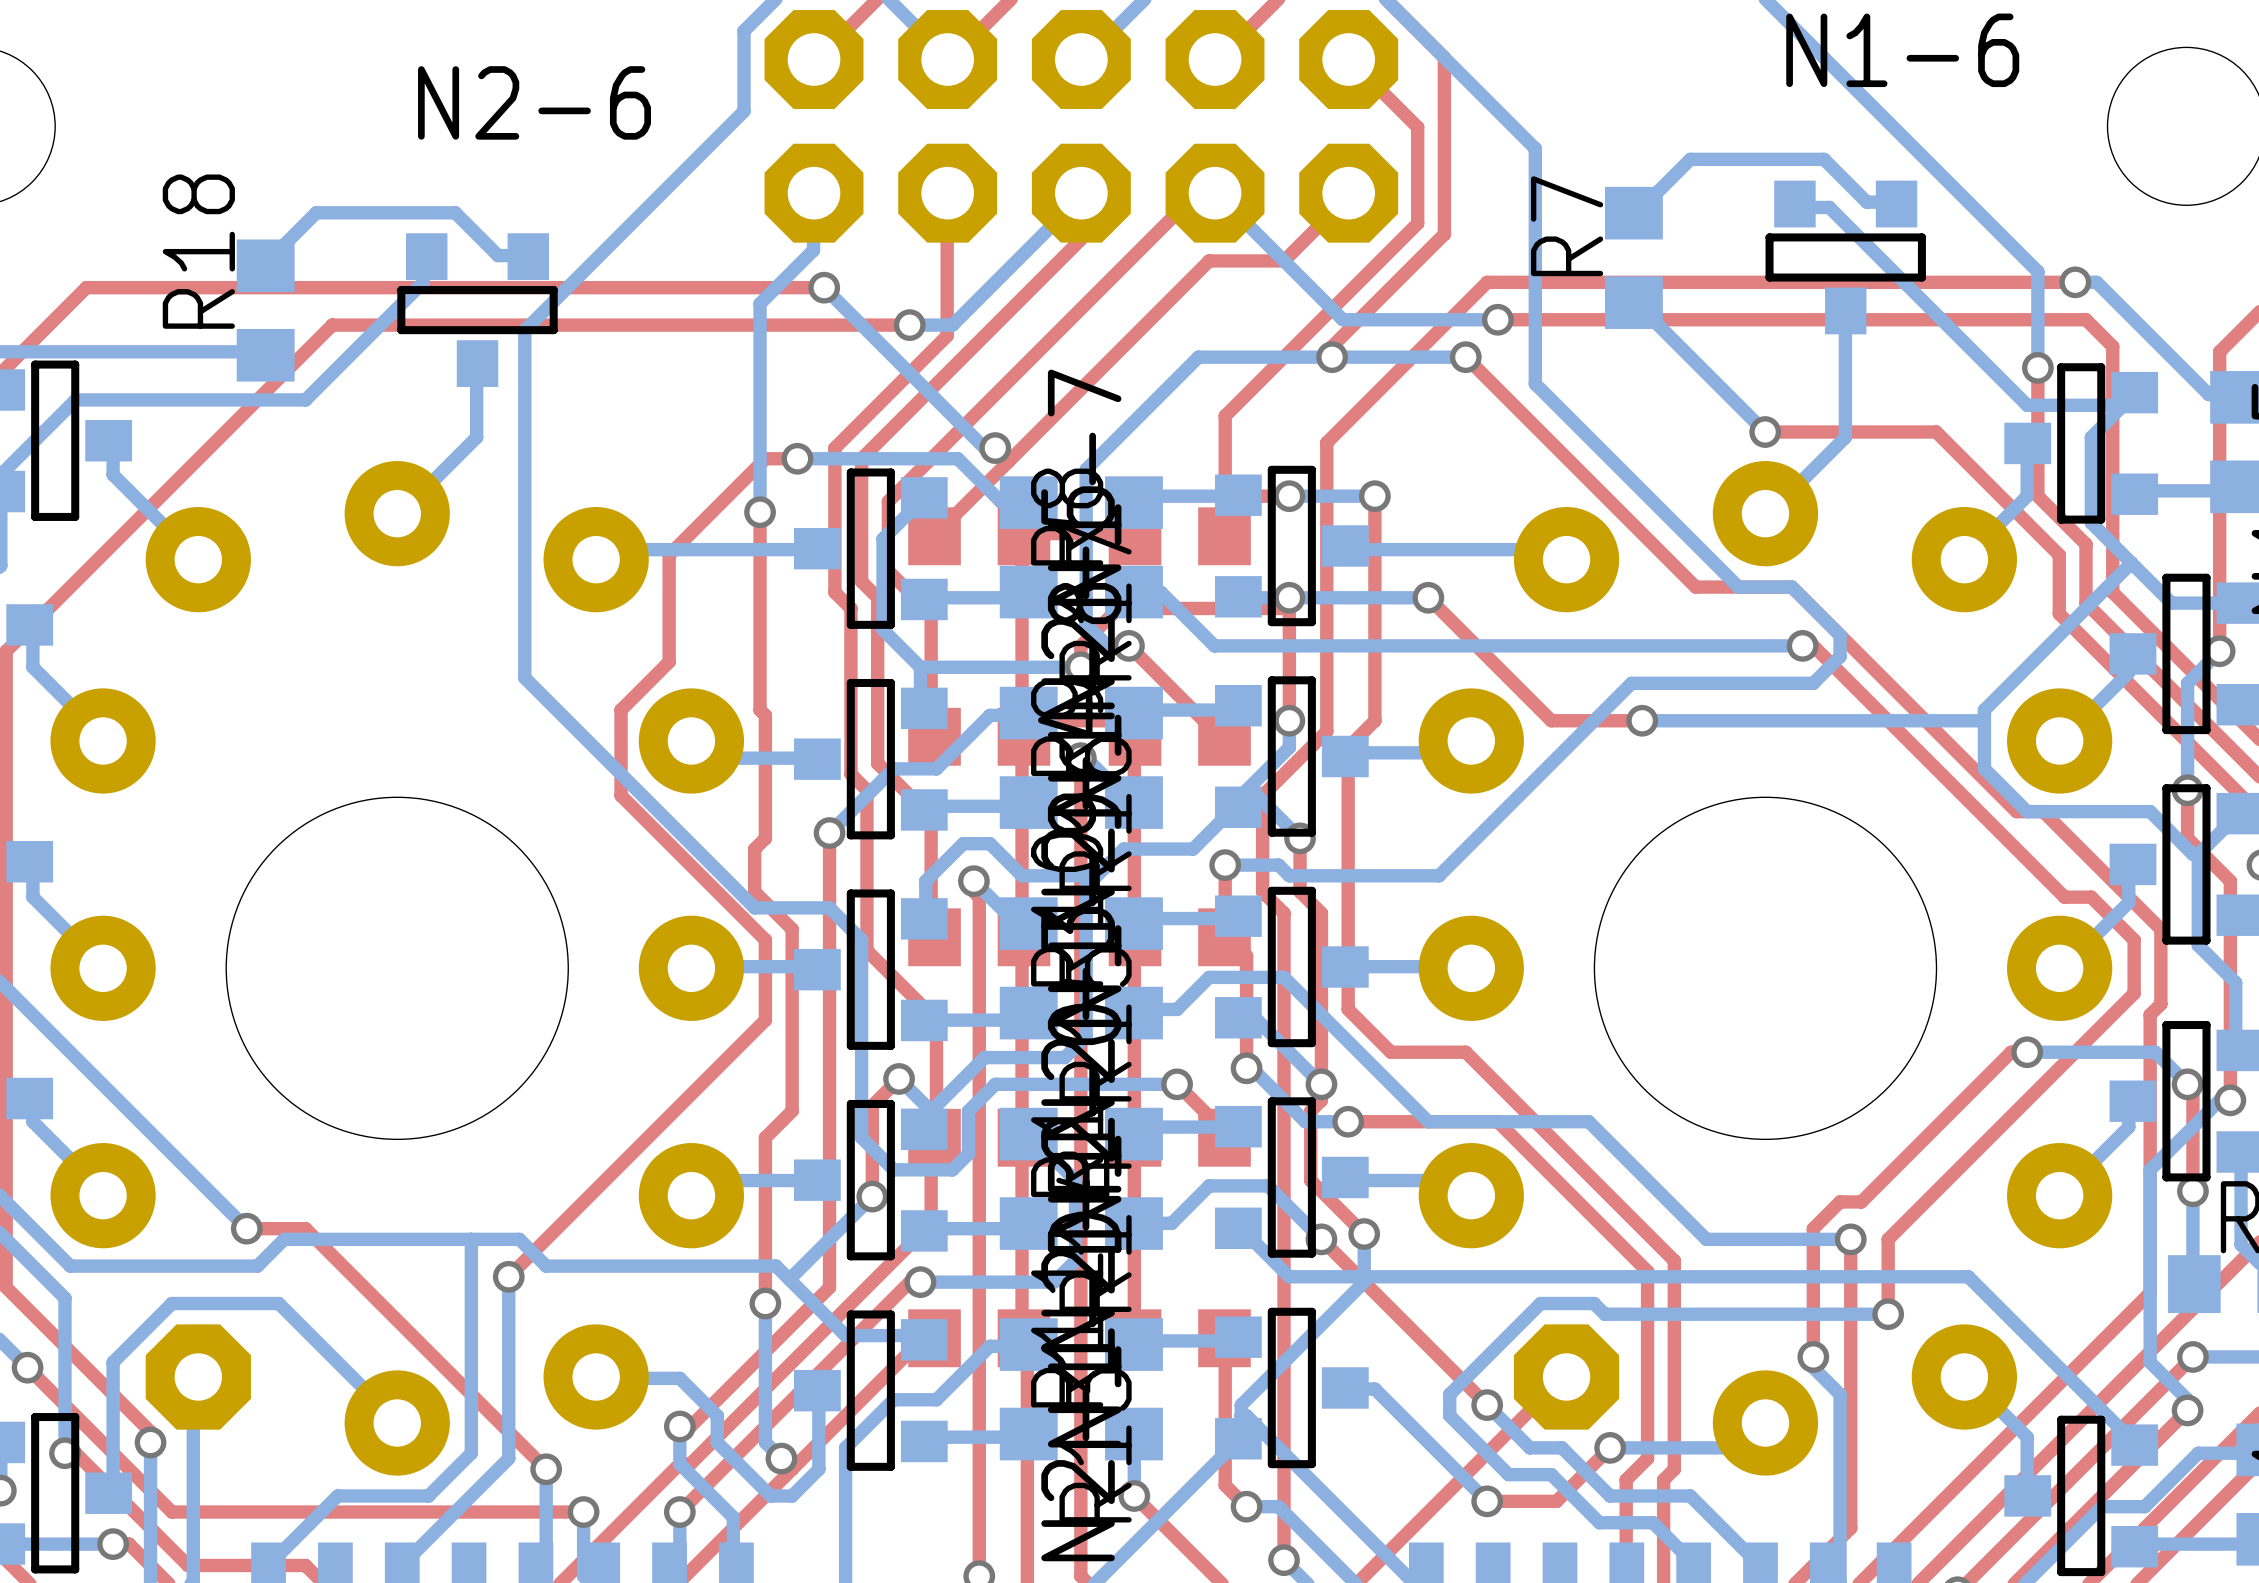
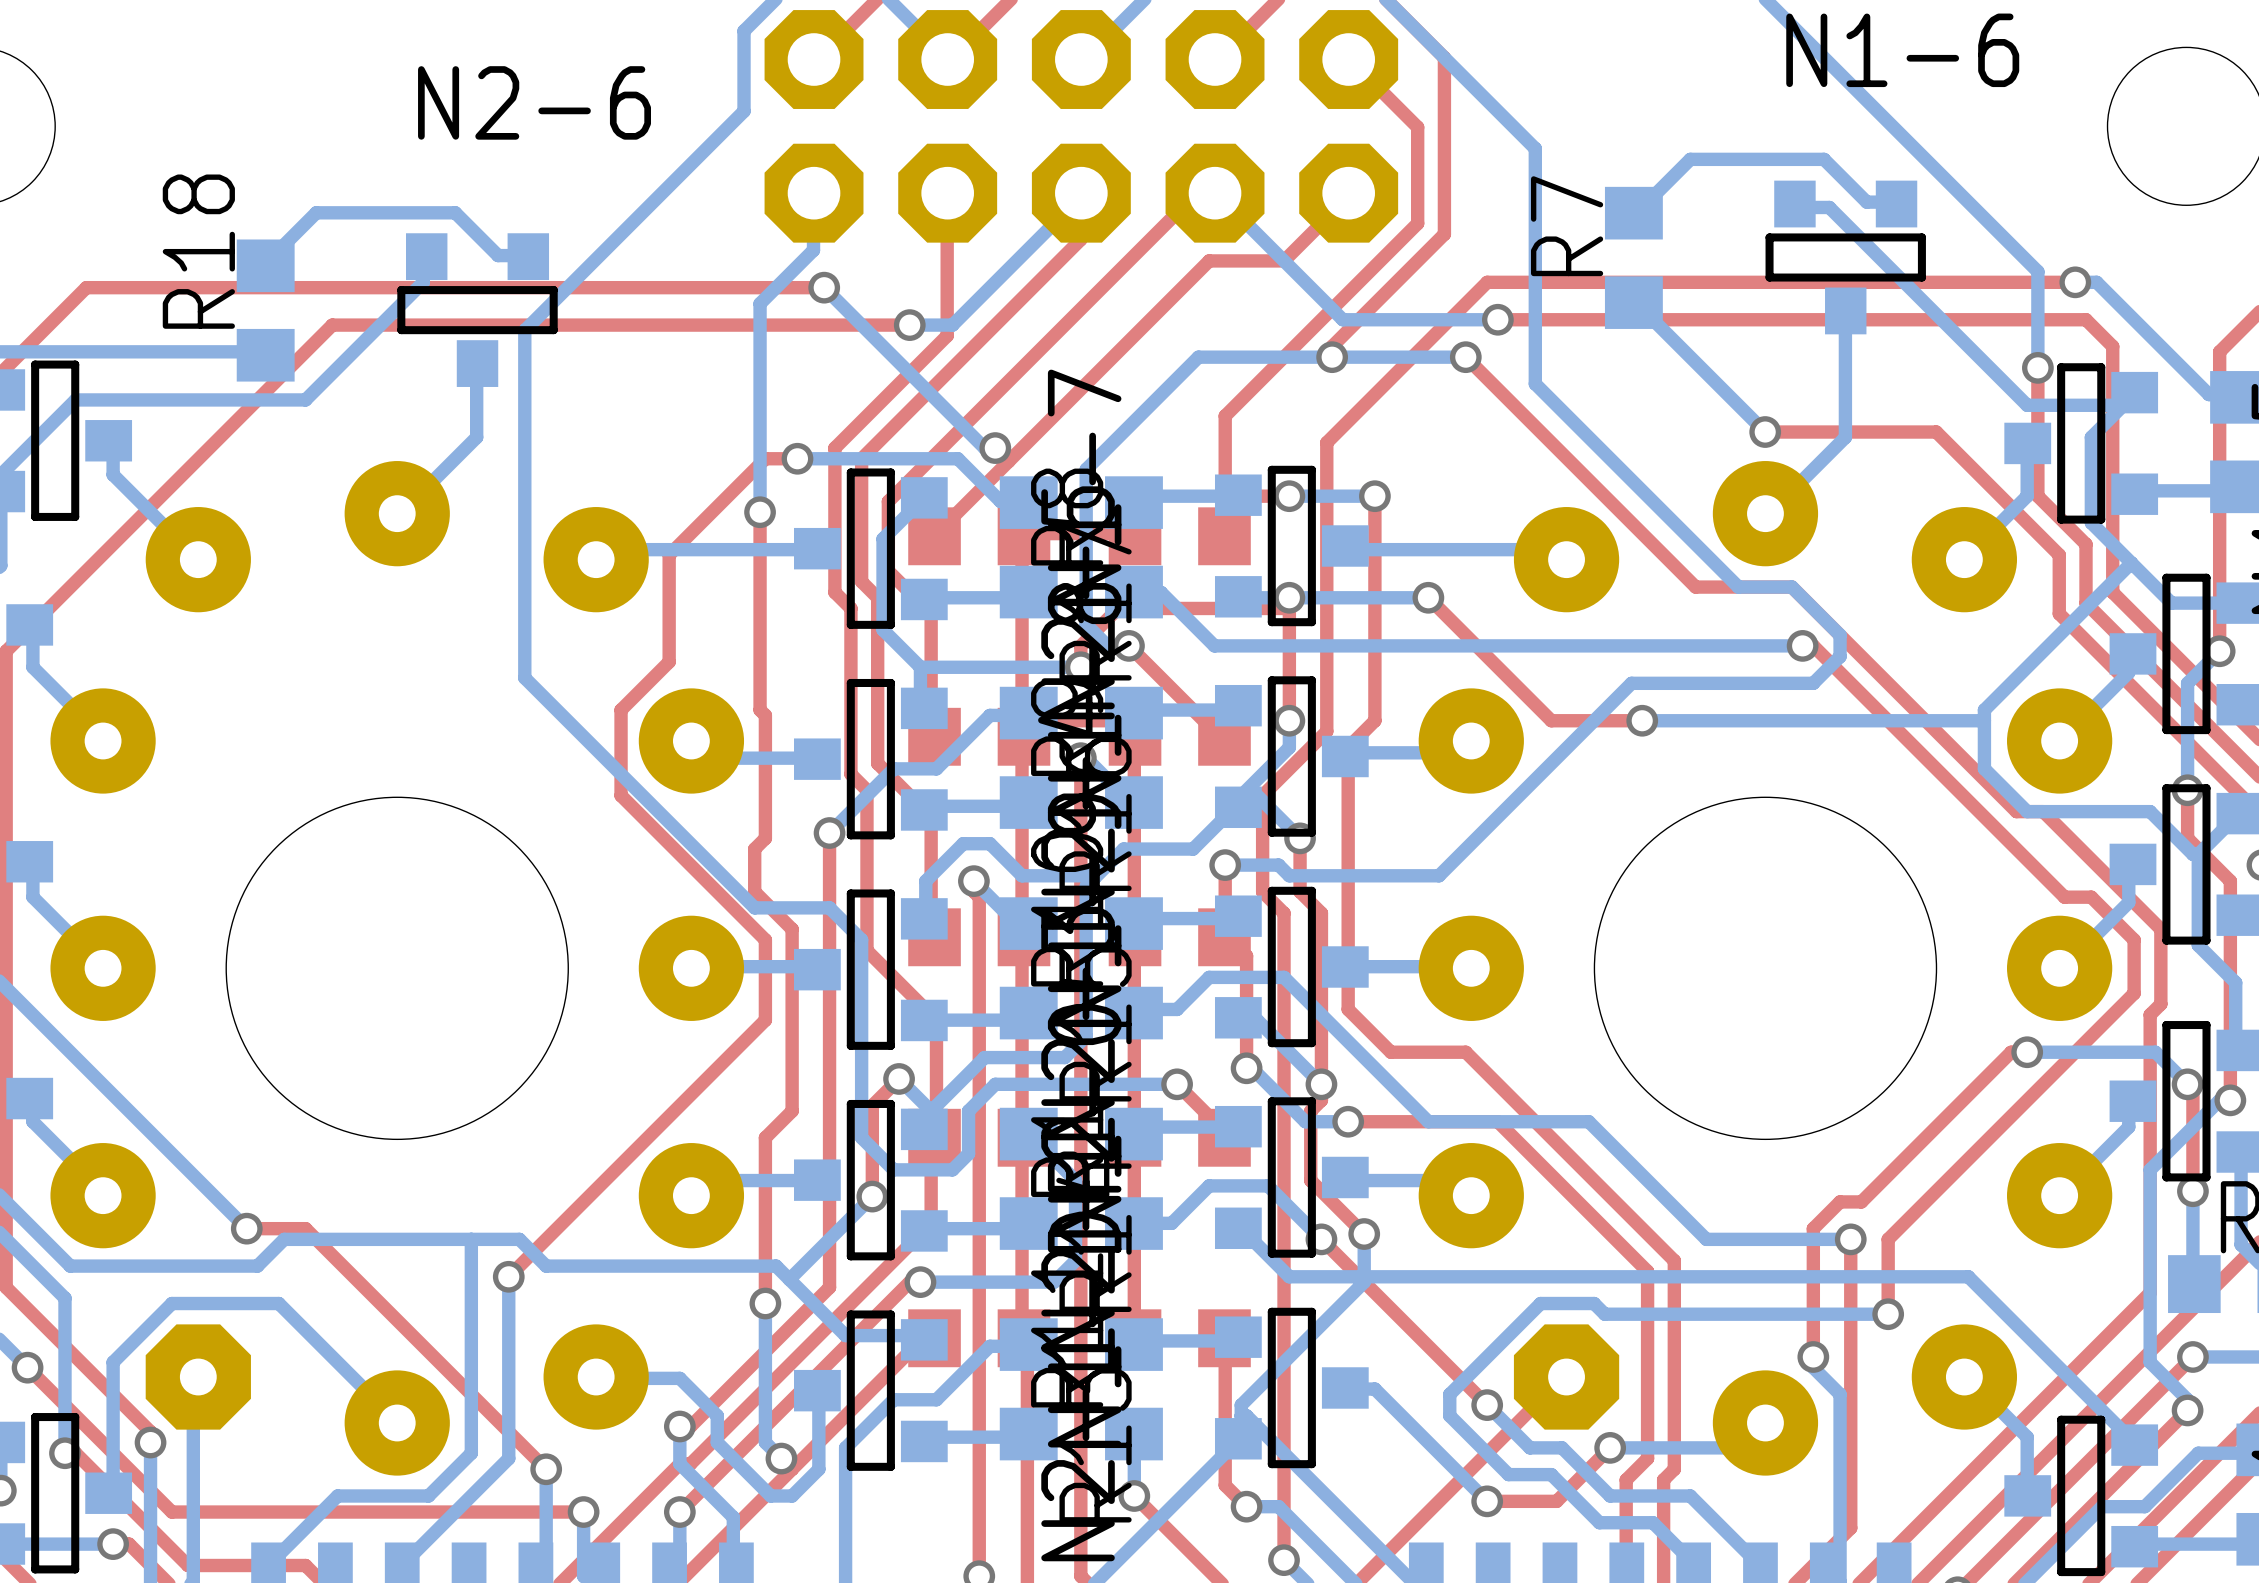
part footprint: [50, 461, 745, 1476] -> [50, 461, 745, 1476]
part footprint: [1418, 461, 2113, 1476] -> [1418, 461, 2113, 1476]

